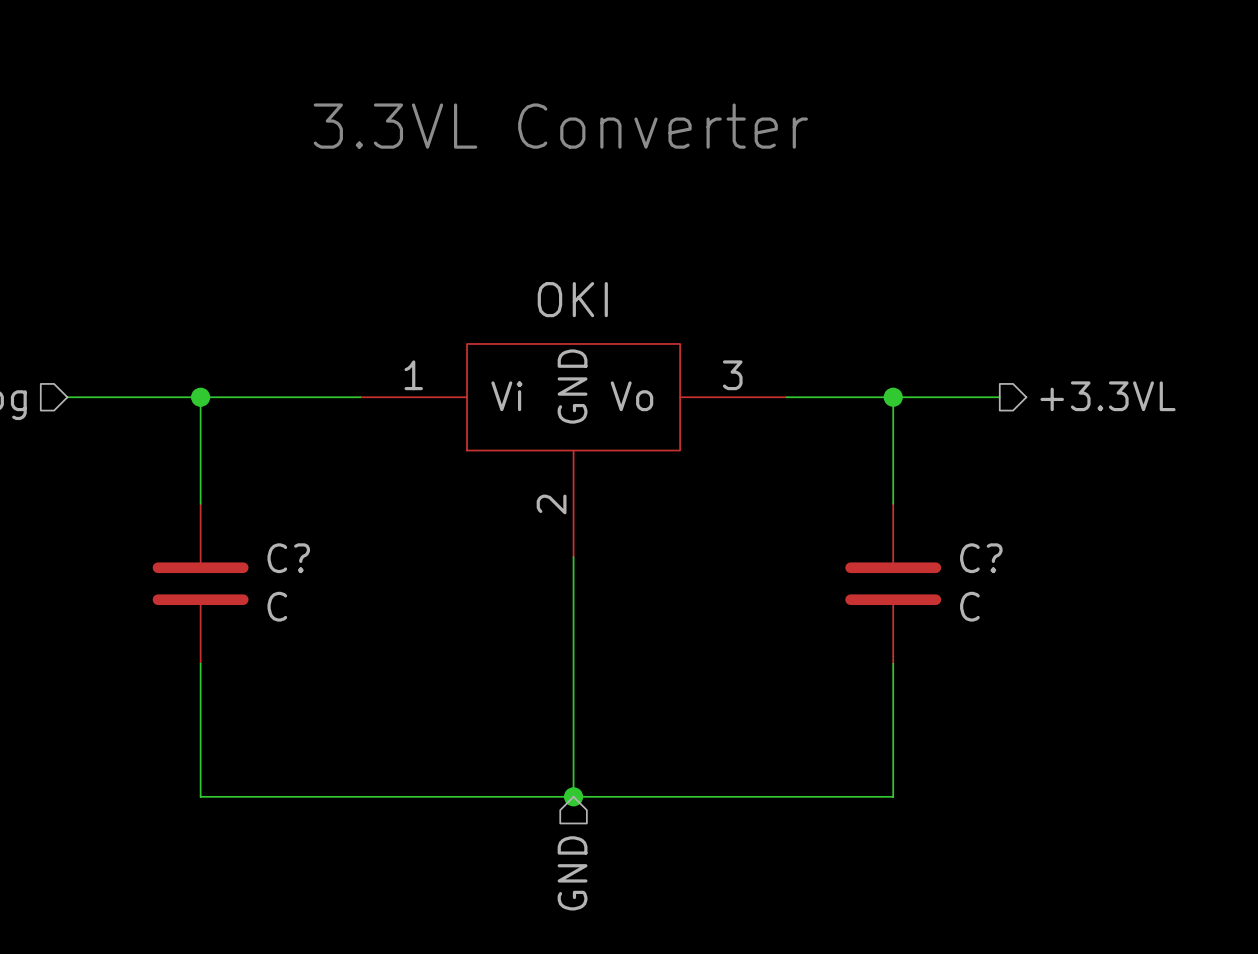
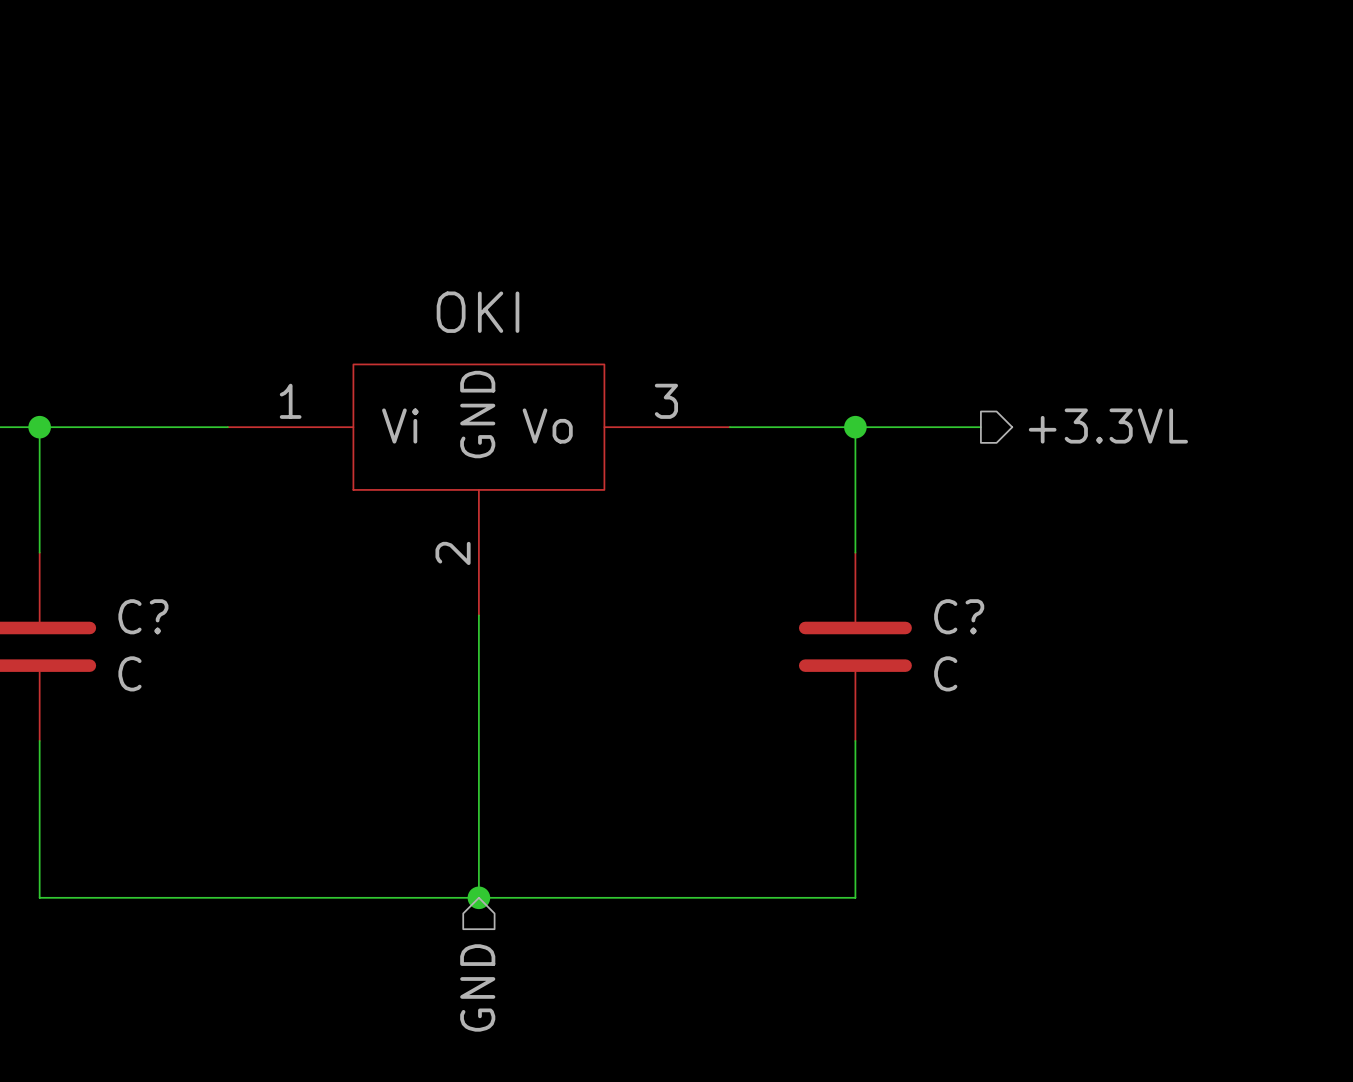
text: 3.3VL Converter (560, 126) -> none

